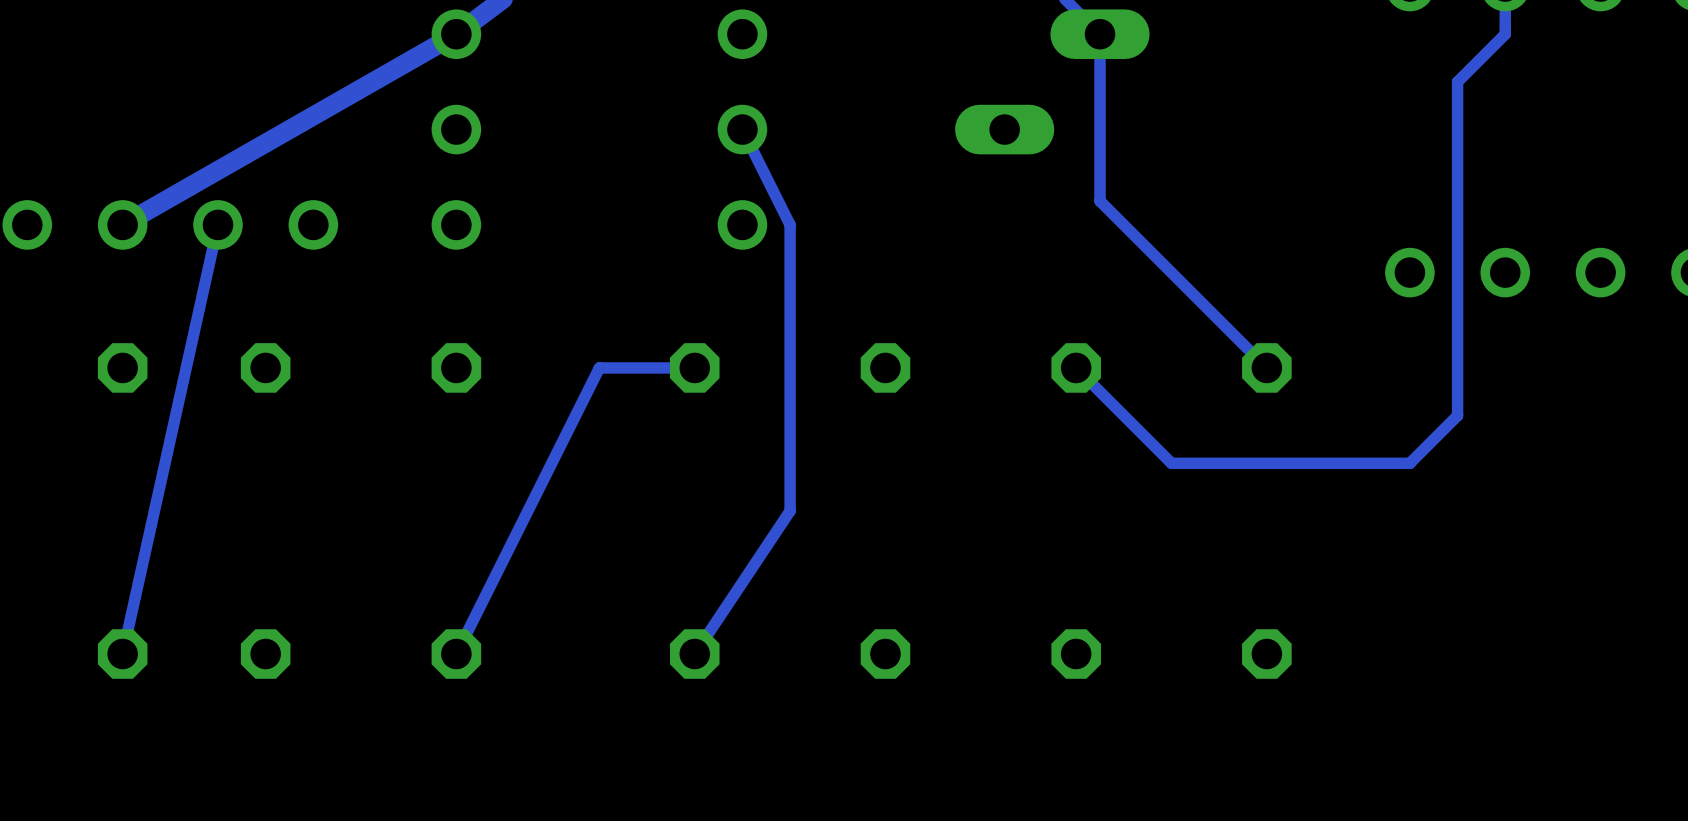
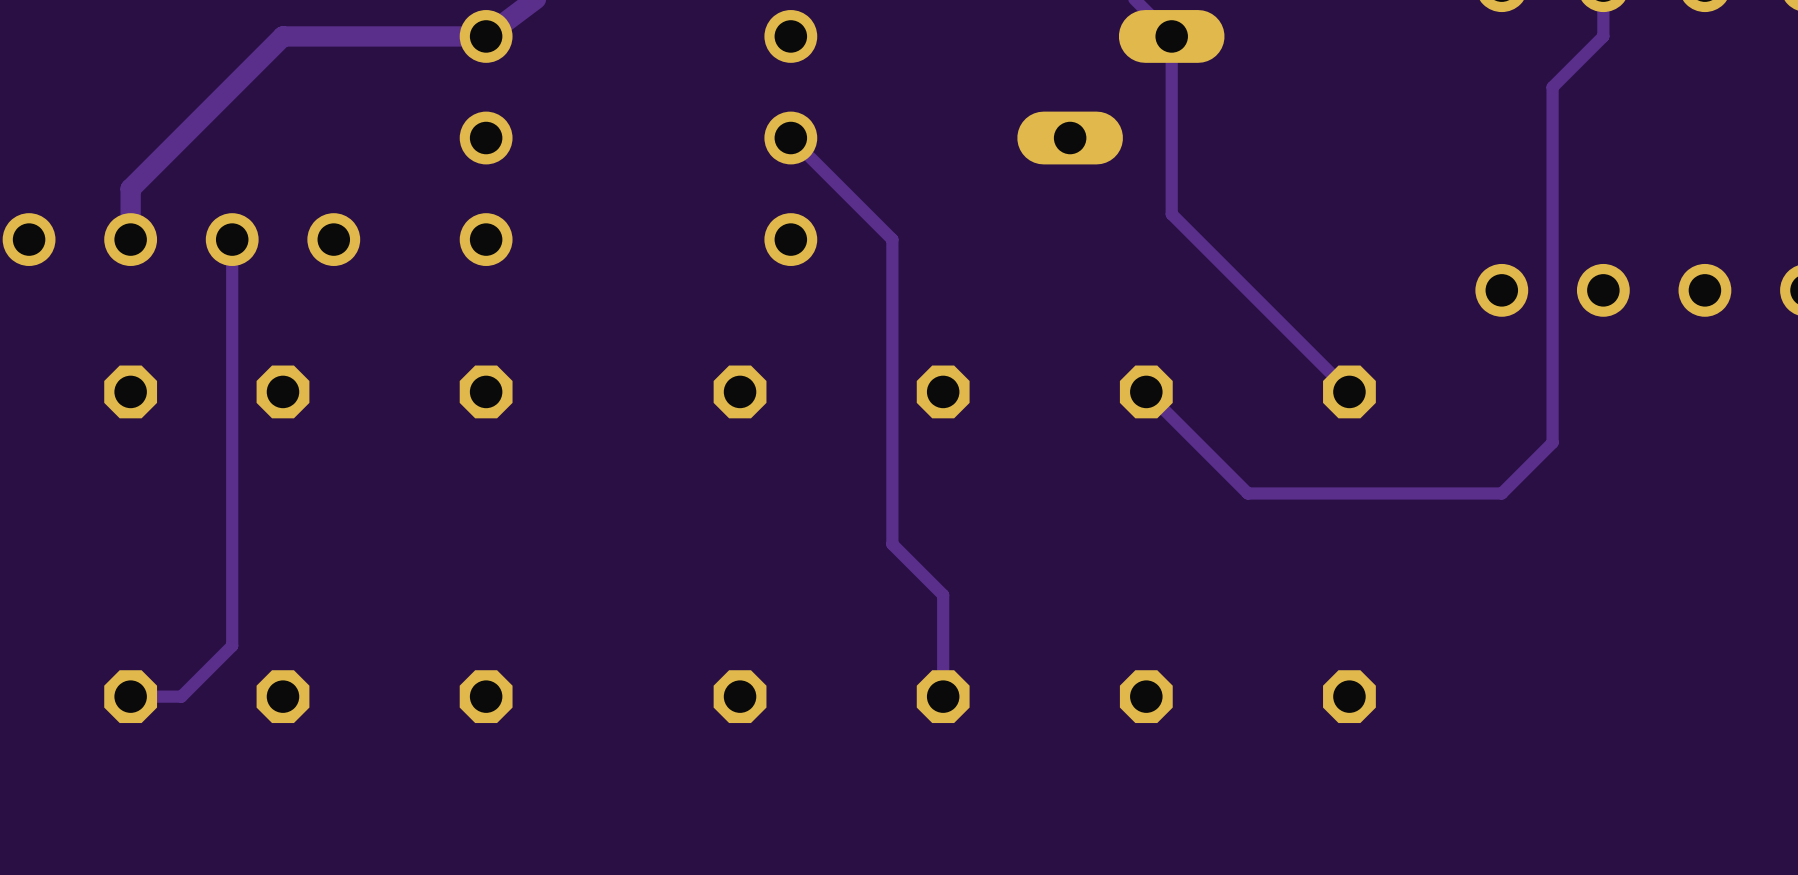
track: (456, 34) (122, 224) -> (486, 36) (282, 36) (130, 188) (130, 239)
track: (742, 129) (790, 224) (790, 510) (694, 654) -> (790, 138) (892, 239) (892, 544) (943, 595) (943, 696)
track: (218, 224) (122, 654) -> (232, 239) (232, 645) (181, 696) (130, 696)
track: (694, 367) (599, 367) (456, 654) -> none

